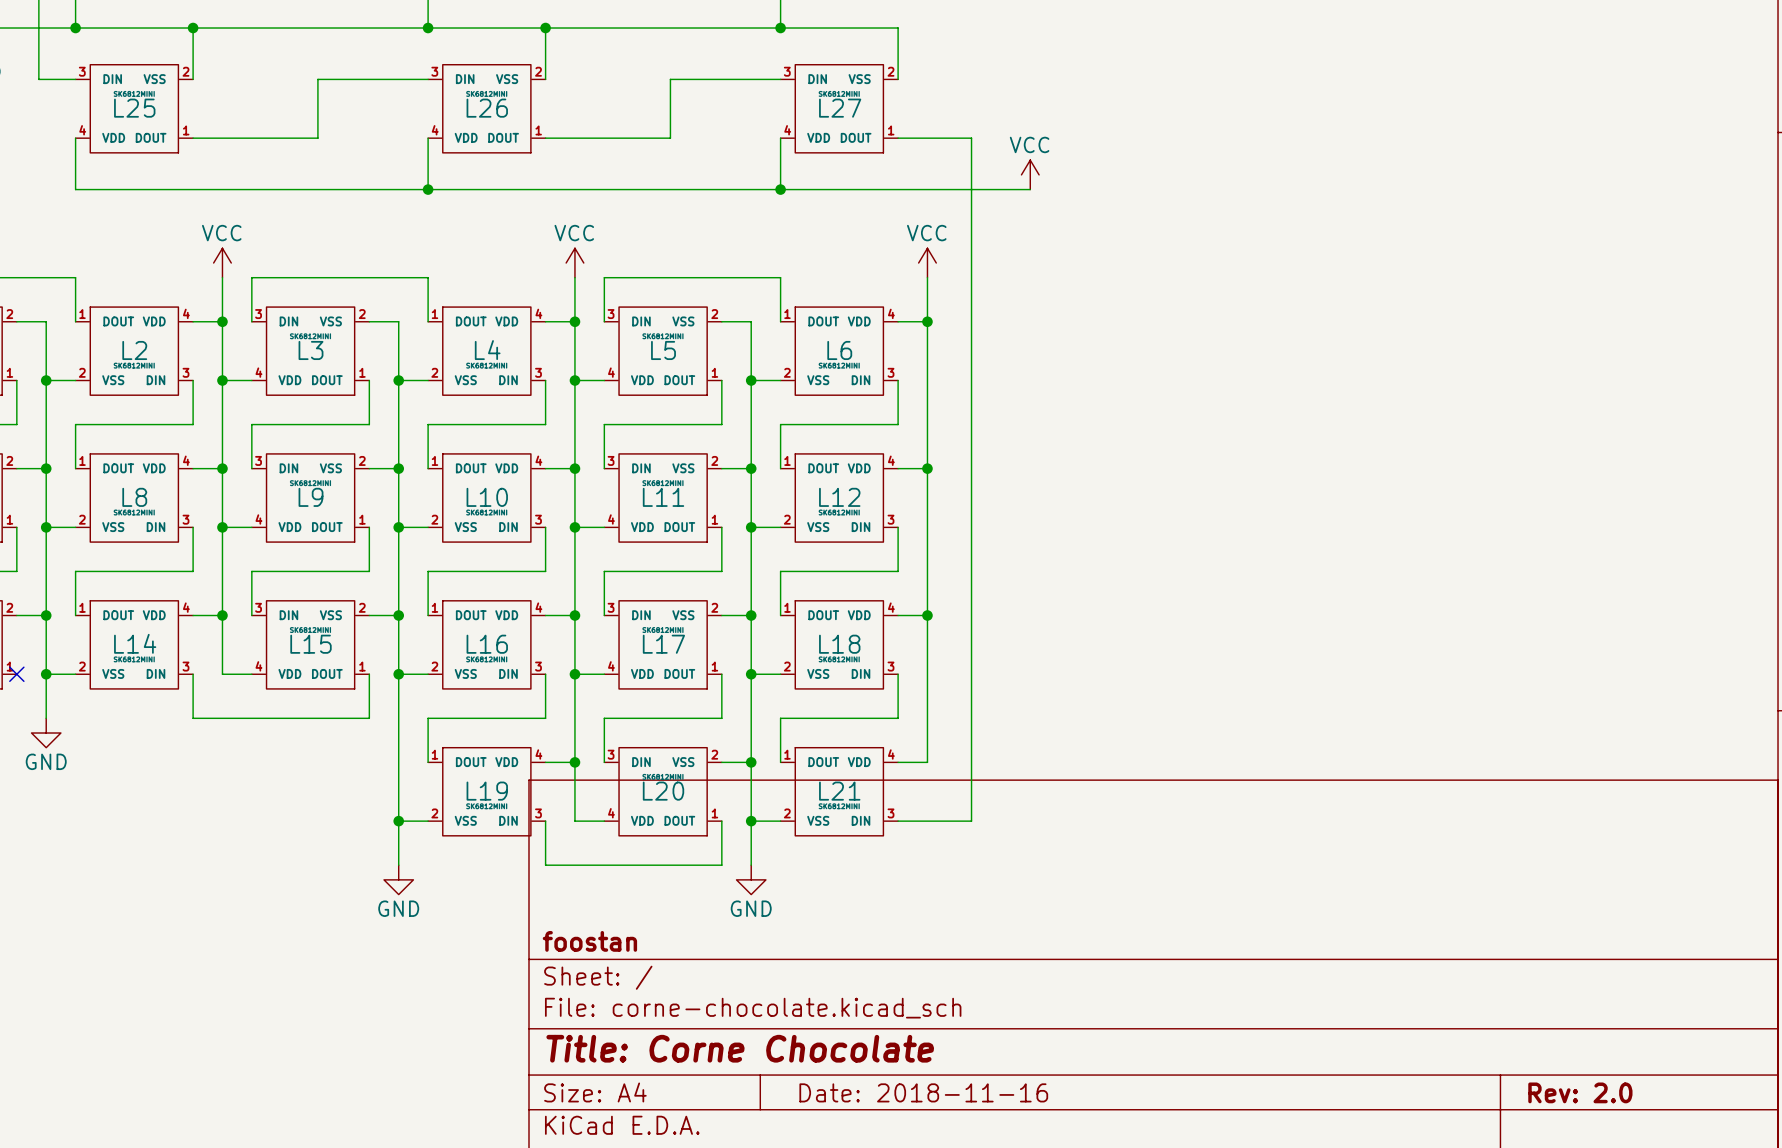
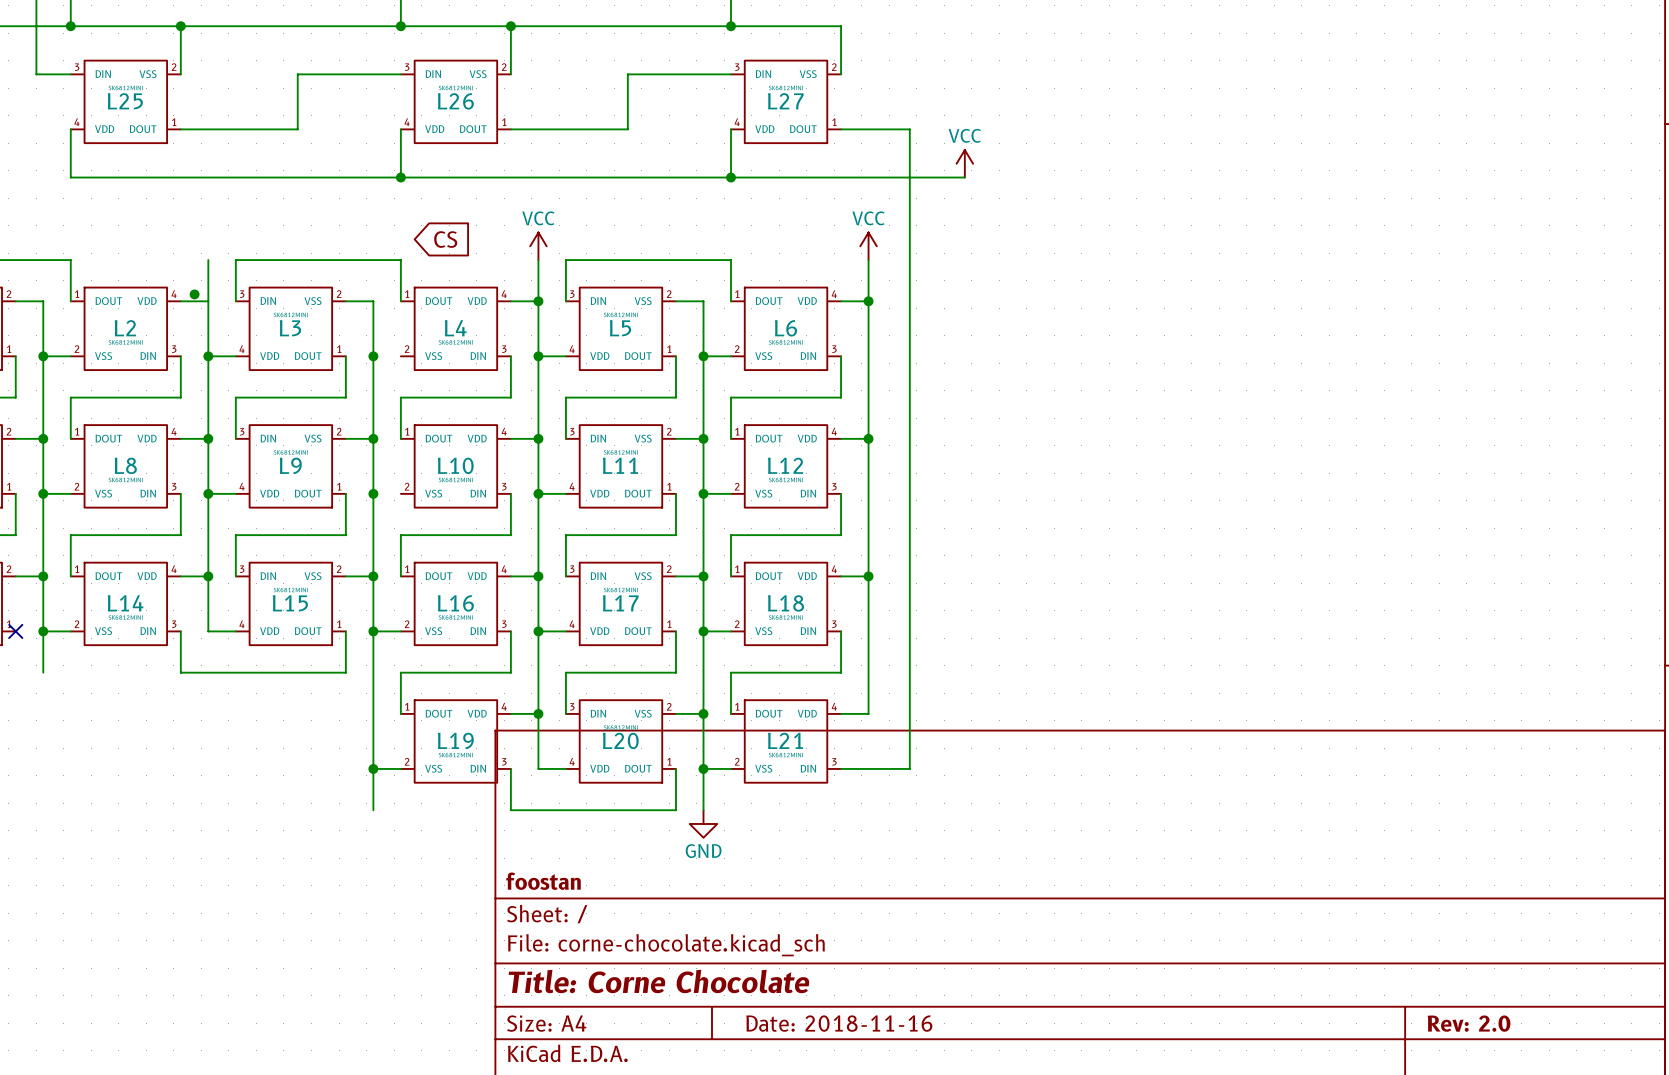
global label: none -> CS (445, 239)
power symbol: VCC (222, 263) -> none
junction position: (222, 321) -> (194, 294)
wire: (398, 380) (428, 380) -> none
wire: (398, 527) (428, 527) -> none
power symbol: GND (46, 733) -> none
power symbol: GND (398, 879) -> none

